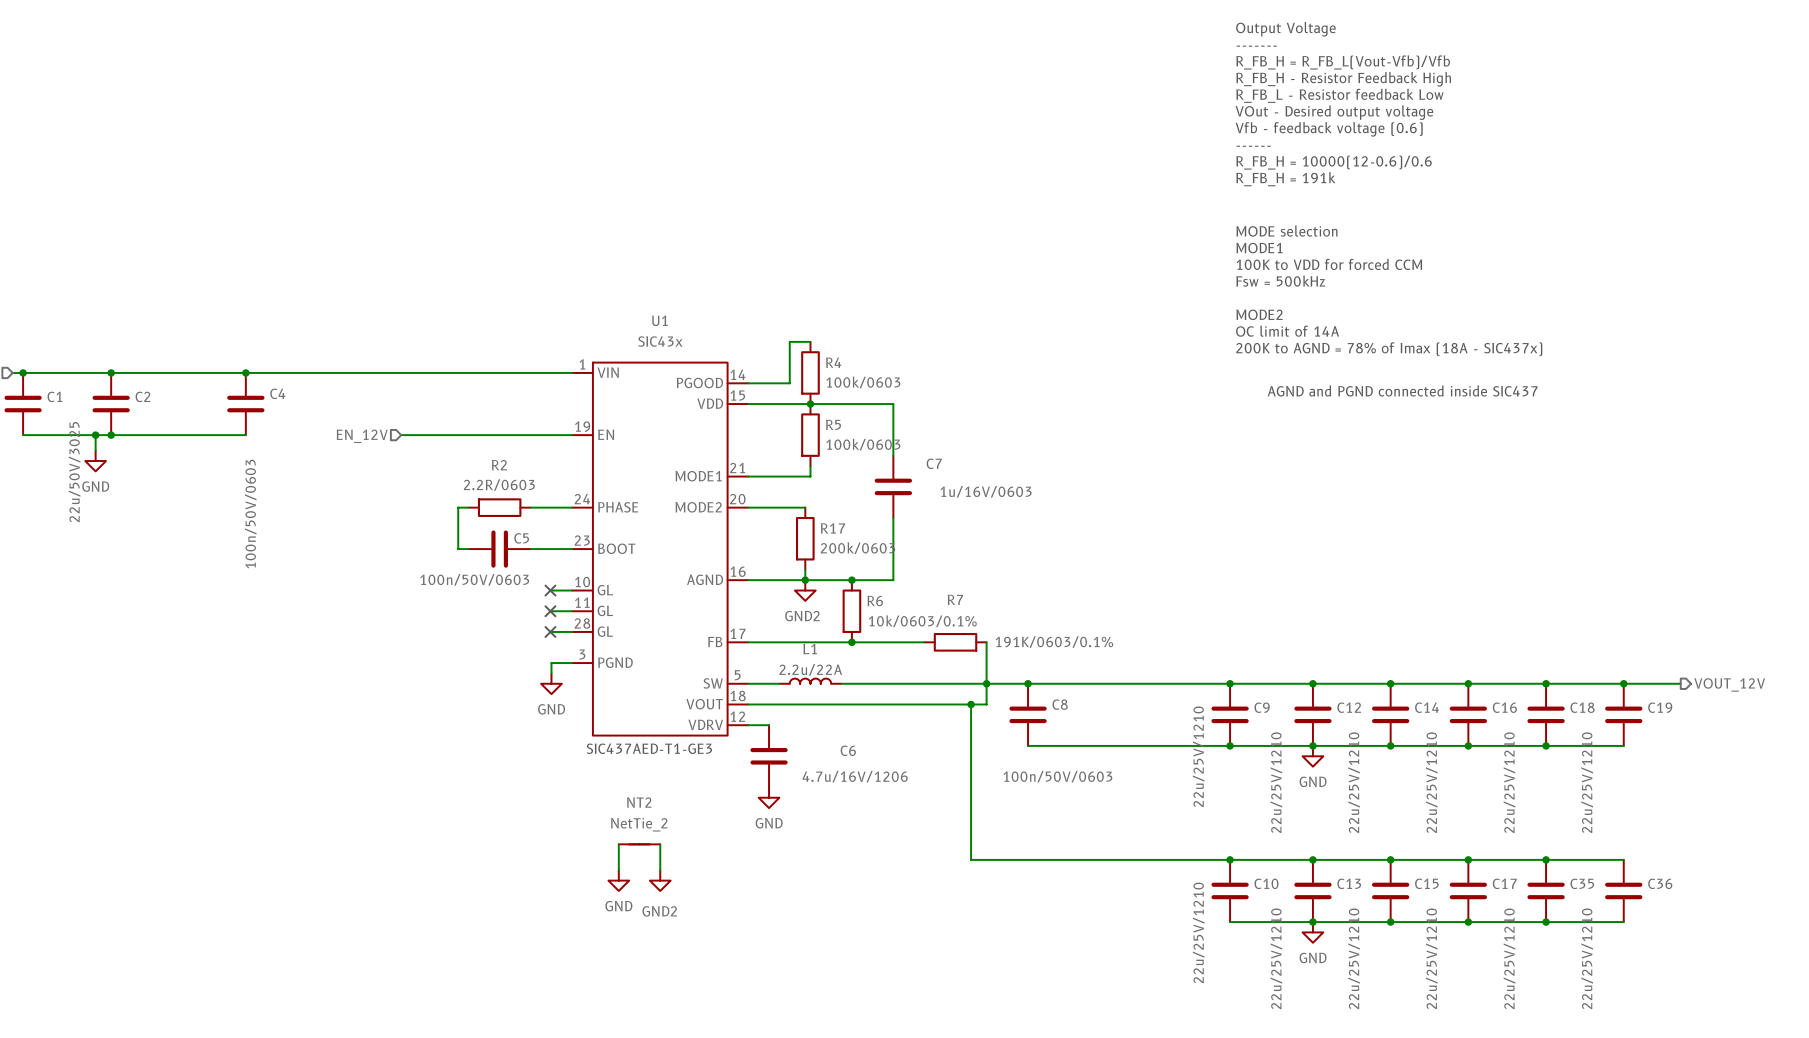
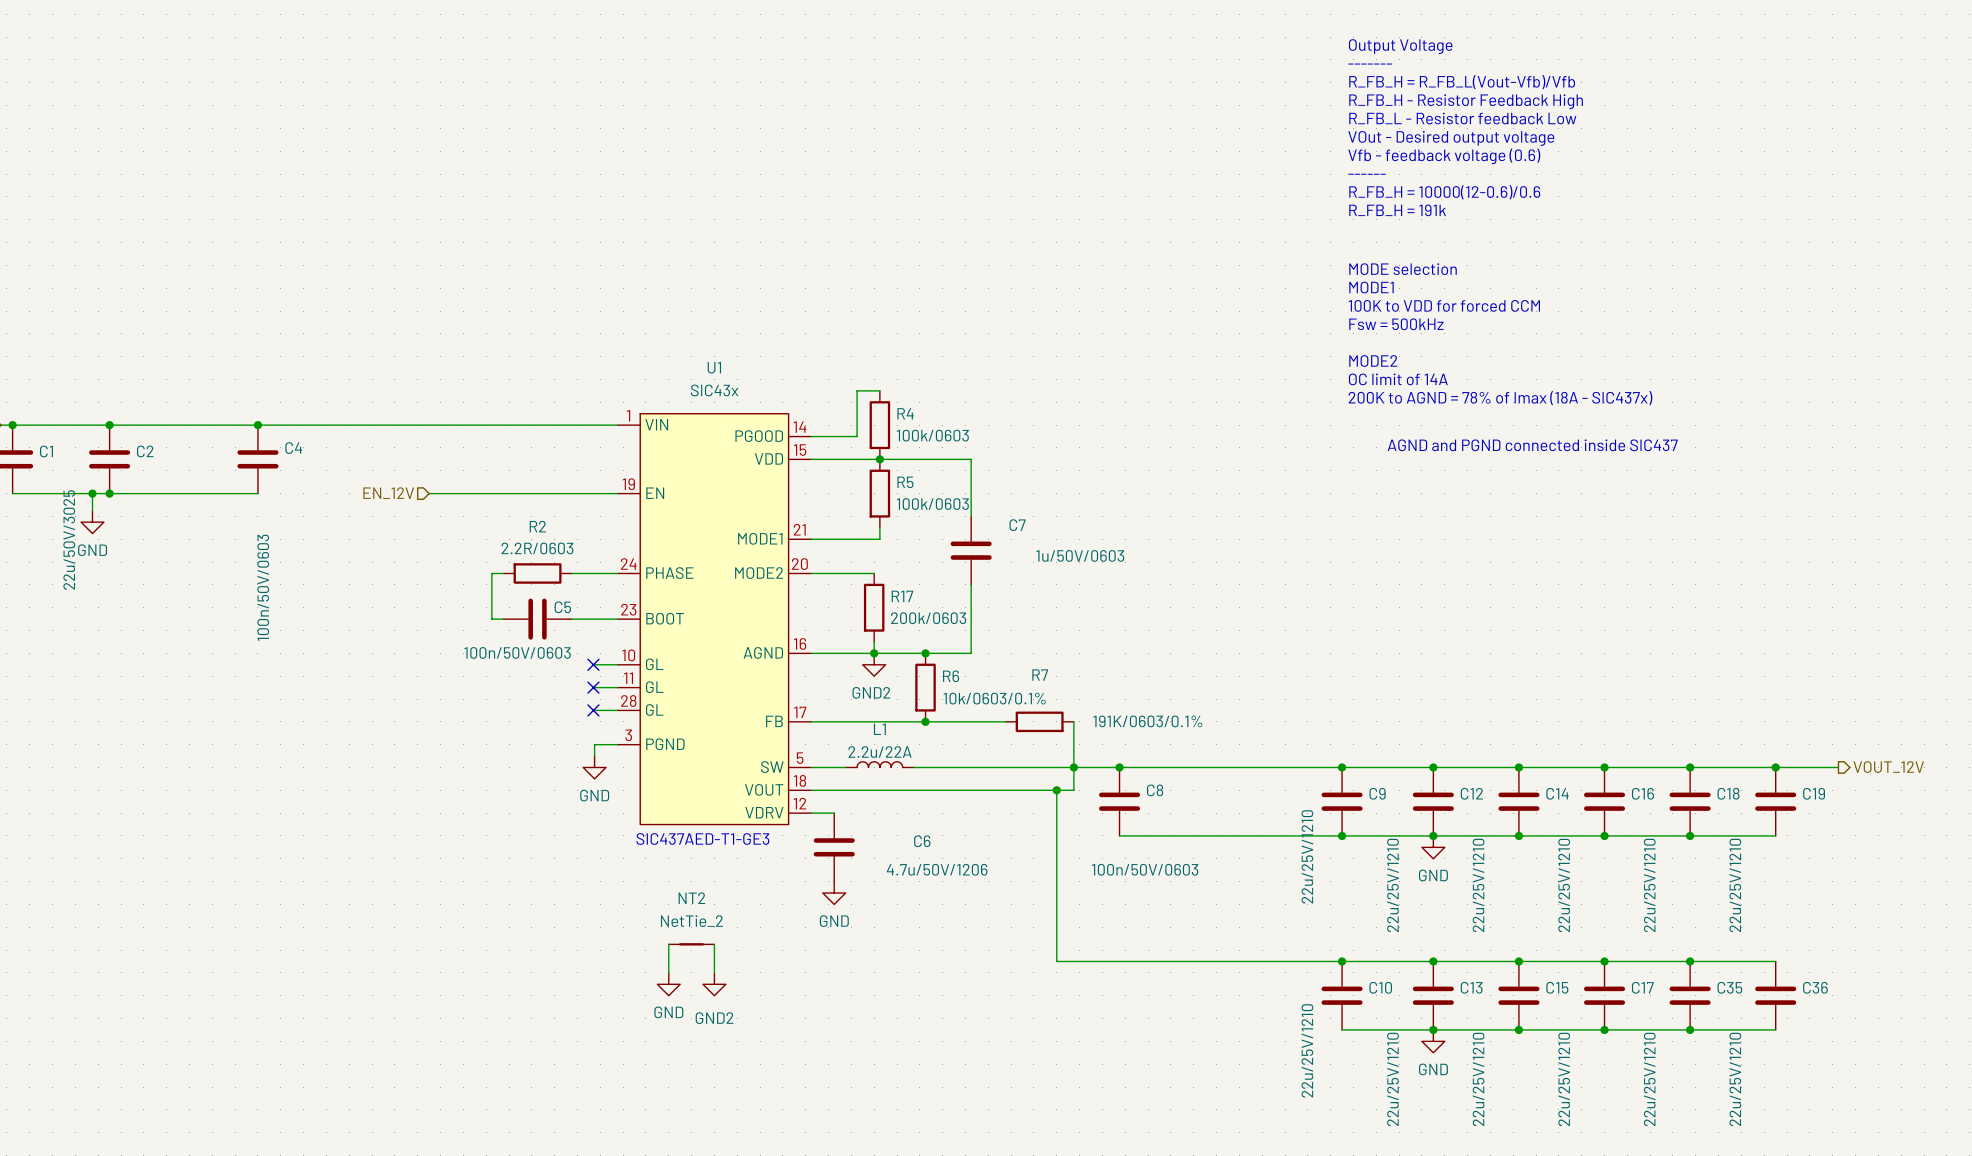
C7 value: 1u/16V/0603 (986, 491) -> 1u/50V/0603 (1080, 555)
C6 value: 4.7u/16V/1206 (855, 776) -> 4.7u/50V/1206 (937, 869)

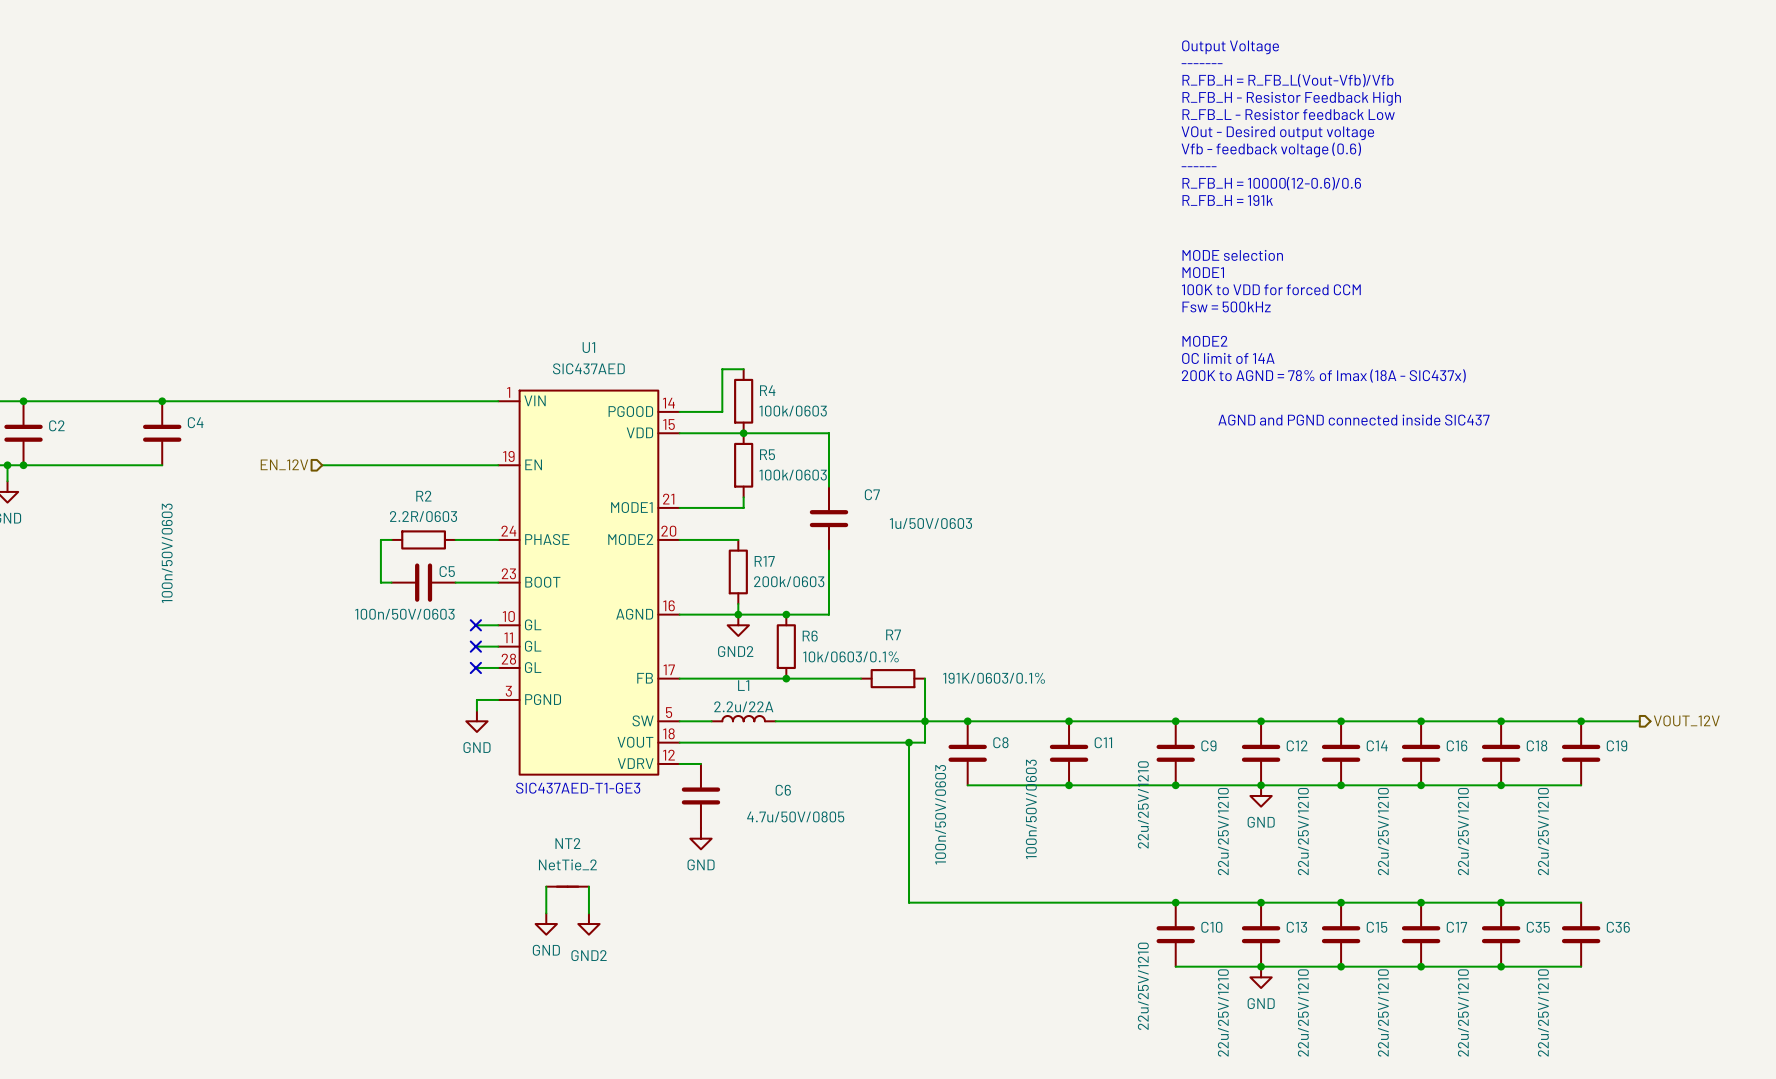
U1 value: SIC43x (714, 390) -> SIC437AED (588, 368)
junction: none -> (1069, 721)
C11: none -> 100n/50V/0603 (1069, 753)
junction: none -> (1069, 785)
C6 value: 4.7u/50V/1206 (937, 869) -> 4.7u/50V/0805 (795, 816)
C8 value rotation: 0° (1145, 869) -> 90° counterclockwise (940, 814)

